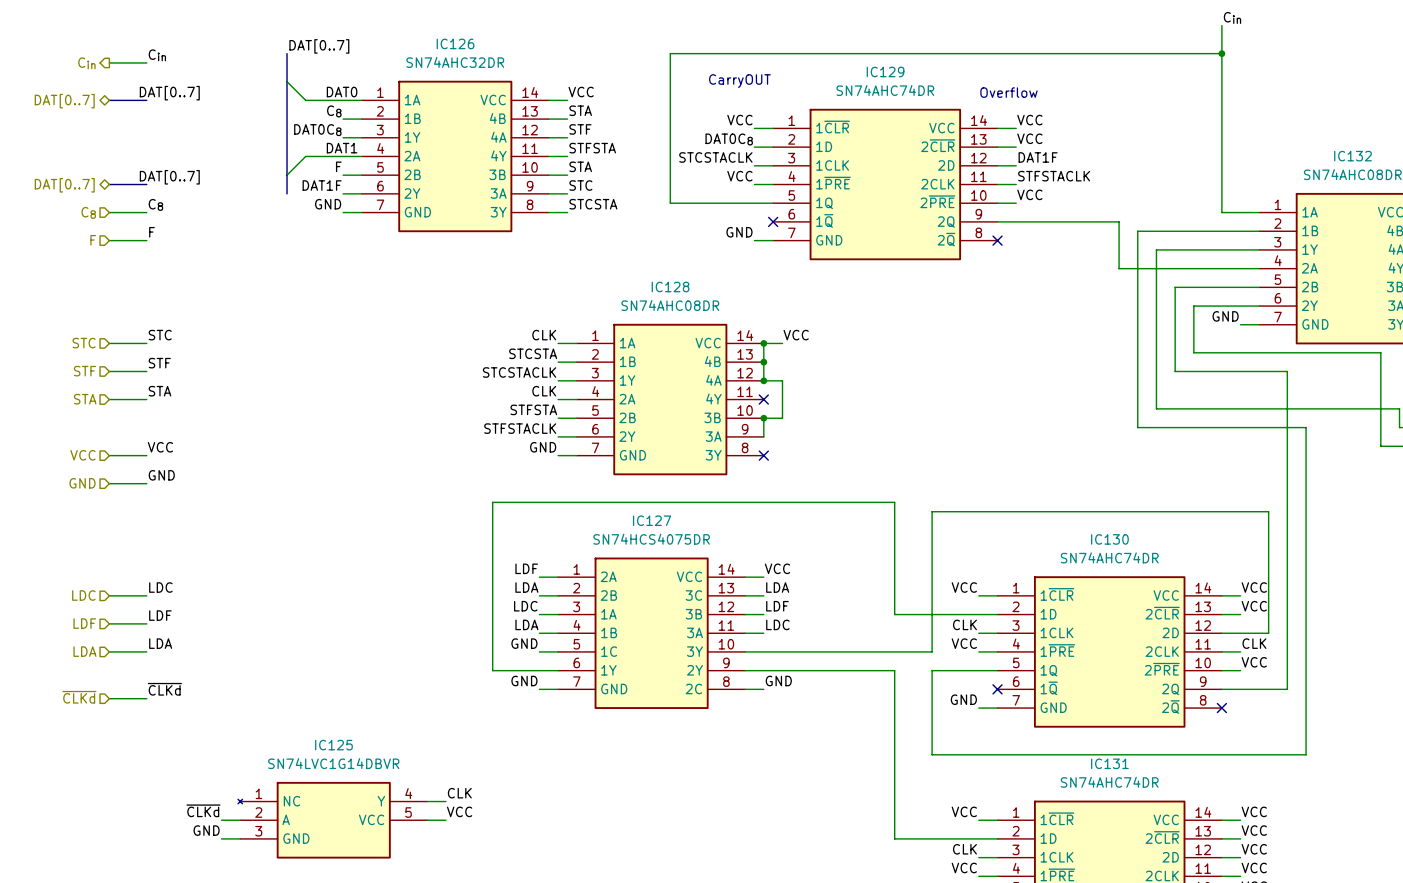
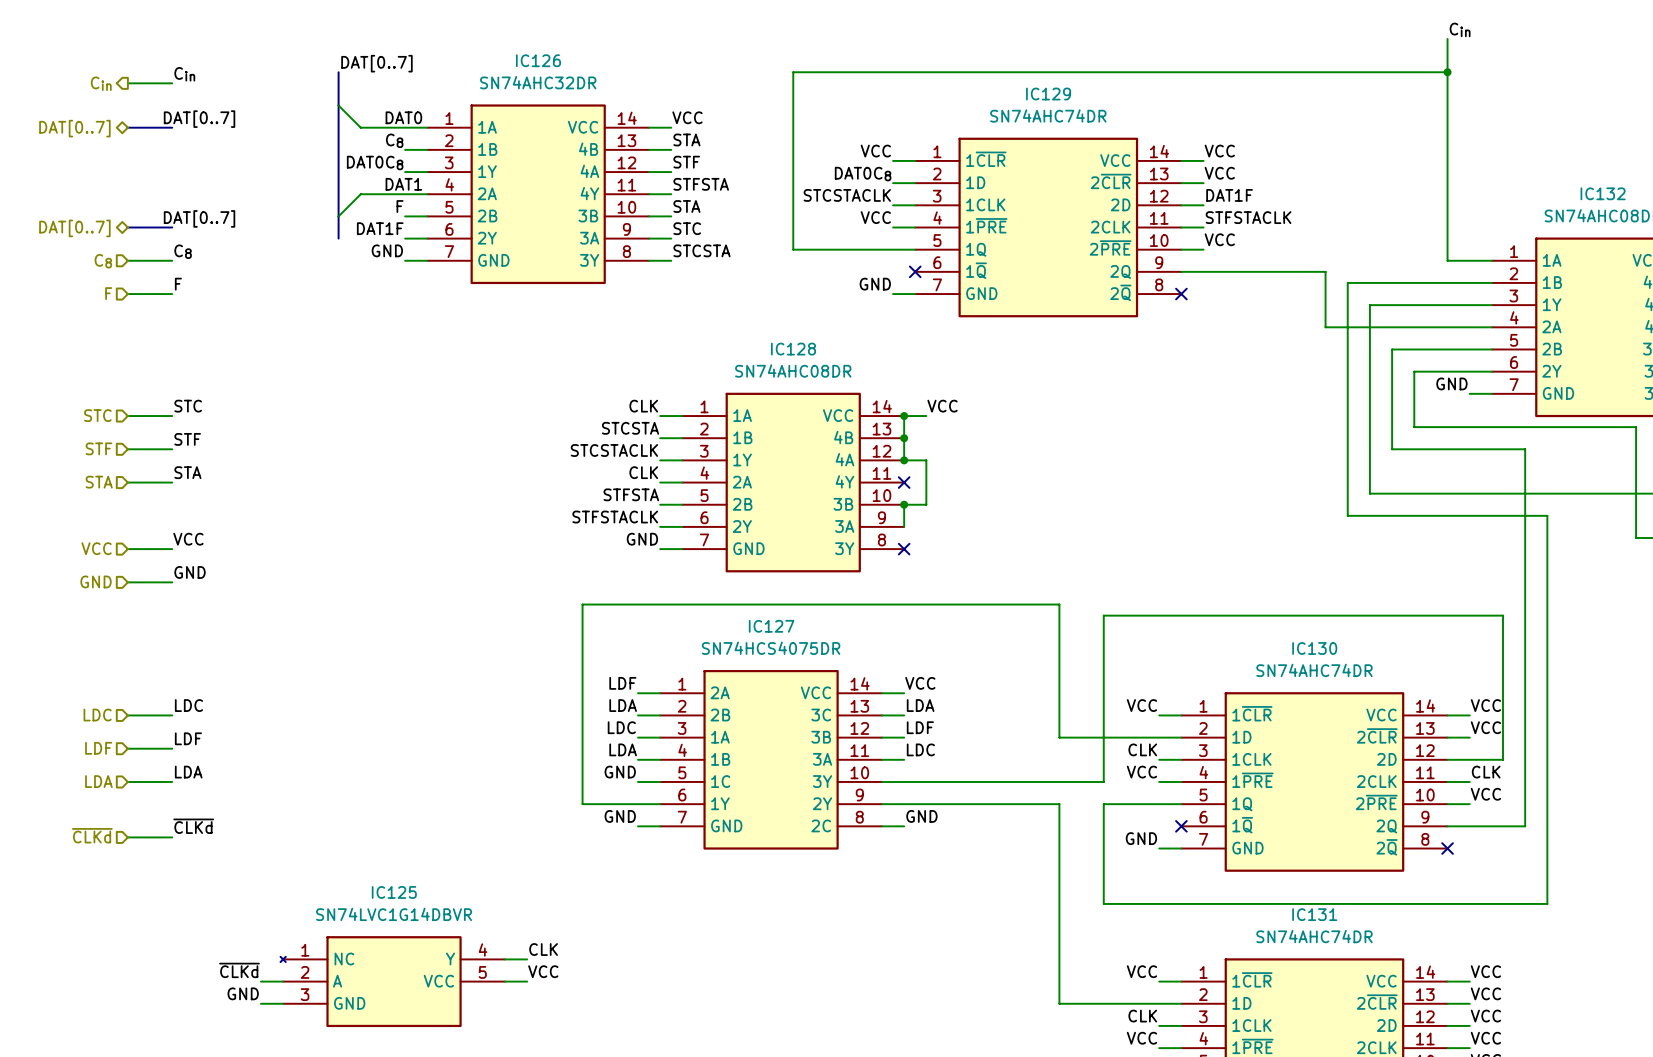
text: CarryOUT (739, 81) -> none
text: Overflow (1008, 92) -> none

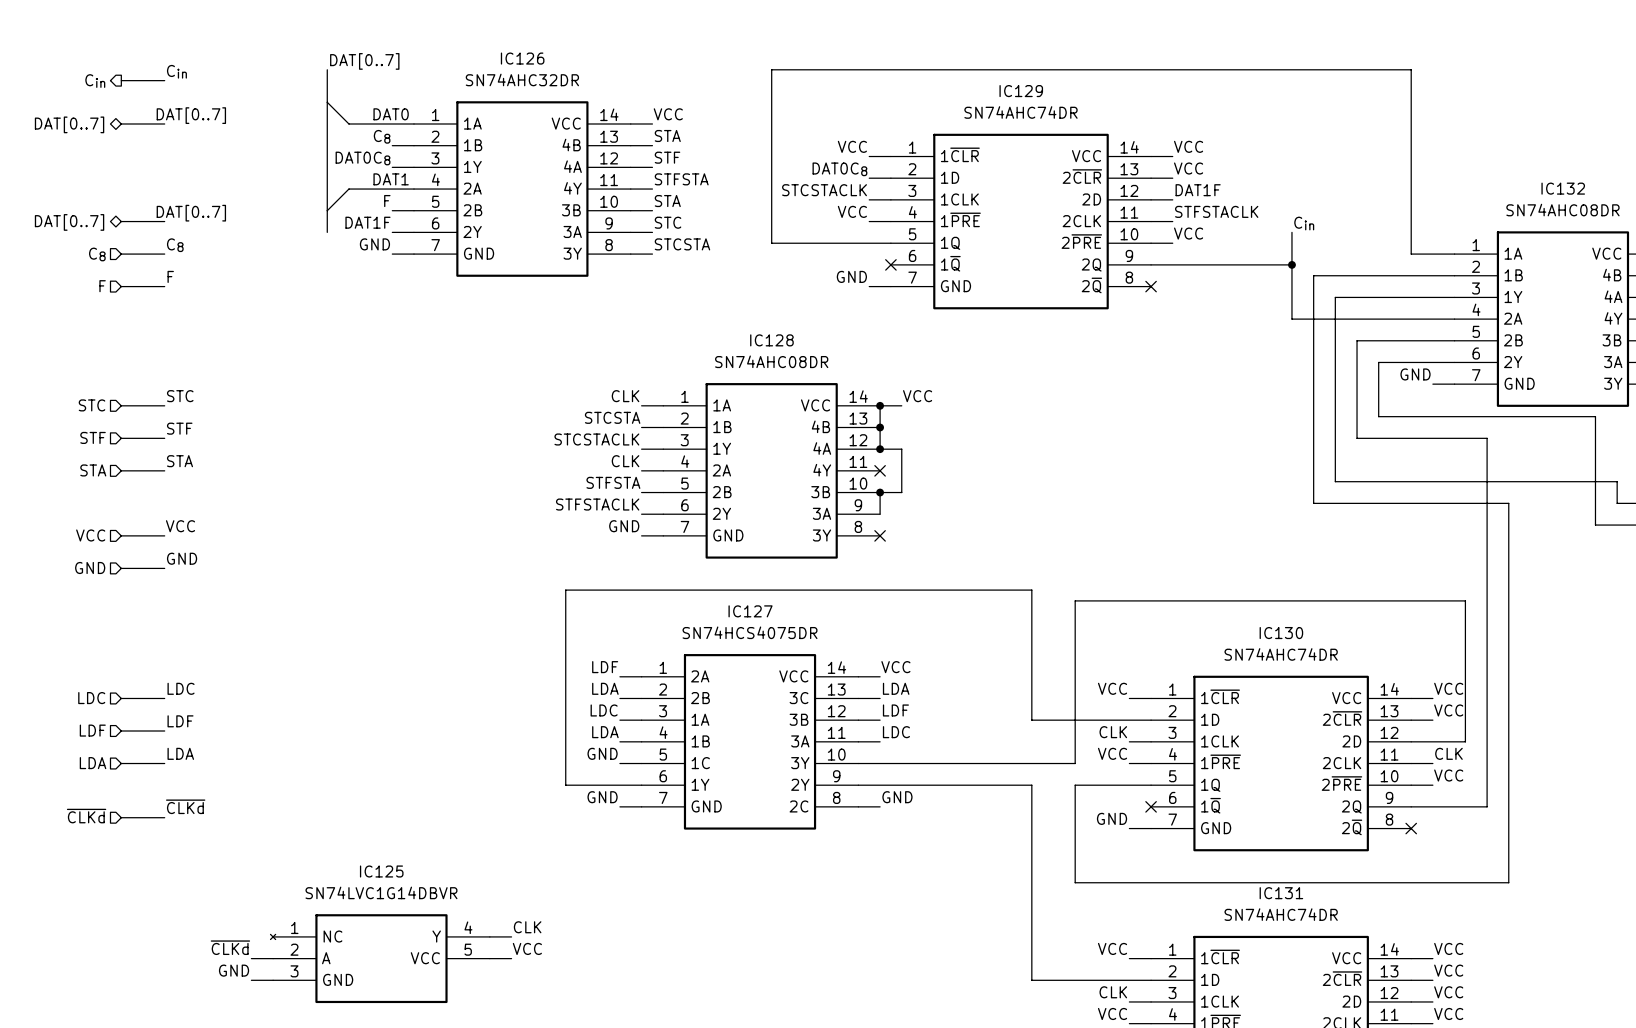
label: Cin (1460, 29) -> none
wire: (1447, 38) (1447, 72) -> none
junction: (1447, 72) -> none
label: none -> Cin (1304, 223)
wire: none -> (1291, 232) (1291, 264)
junction: none -> (1291, 264)

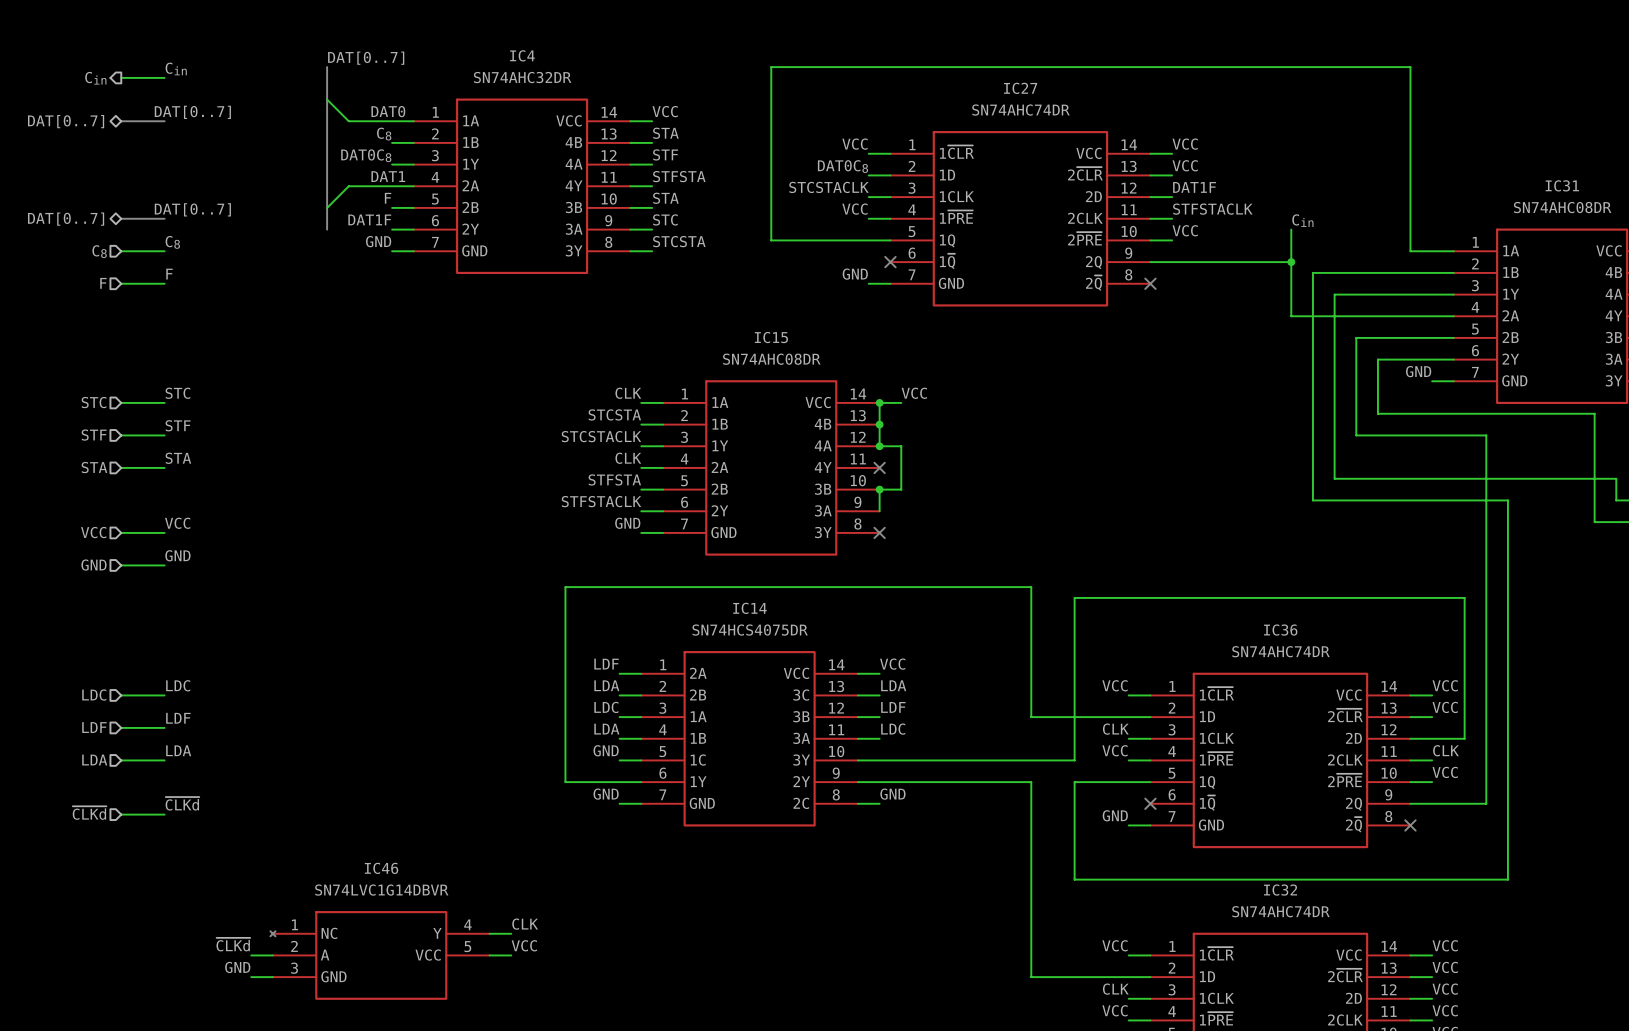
IC126 name: IC126 (522, 58) -> IC4 (522, 55)
IC129 name: IC129 (1021, 91) -> IC27 (1020, 88)
IC132 name: IC132 (1563, 188) -> IC31 (1562, 185)
IC128 name: IC128 (771, 340) -> IC15 (771, 337)
IC127 name: IC127 (750, 611) -> IC14 (749, 608)
IC130 name: IC130 (1281, 633) -> IC36 (1280, 630)
IC125 name: IC125 (381, 871) -> IC46 (381, 868)
IC131 name: IC131 (1281, 893) -> IC32 (1280, 890)

